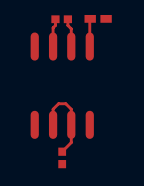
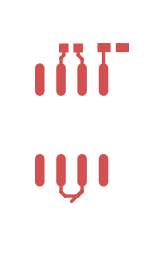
top track: (71, 124) (71, 109) (65, 103) (58, 103) (53, 109) (53, 124) -> (82, 190) (77, 196) (65, 196) (61, 191) (61, 170)
part: (62, 157) -> none

